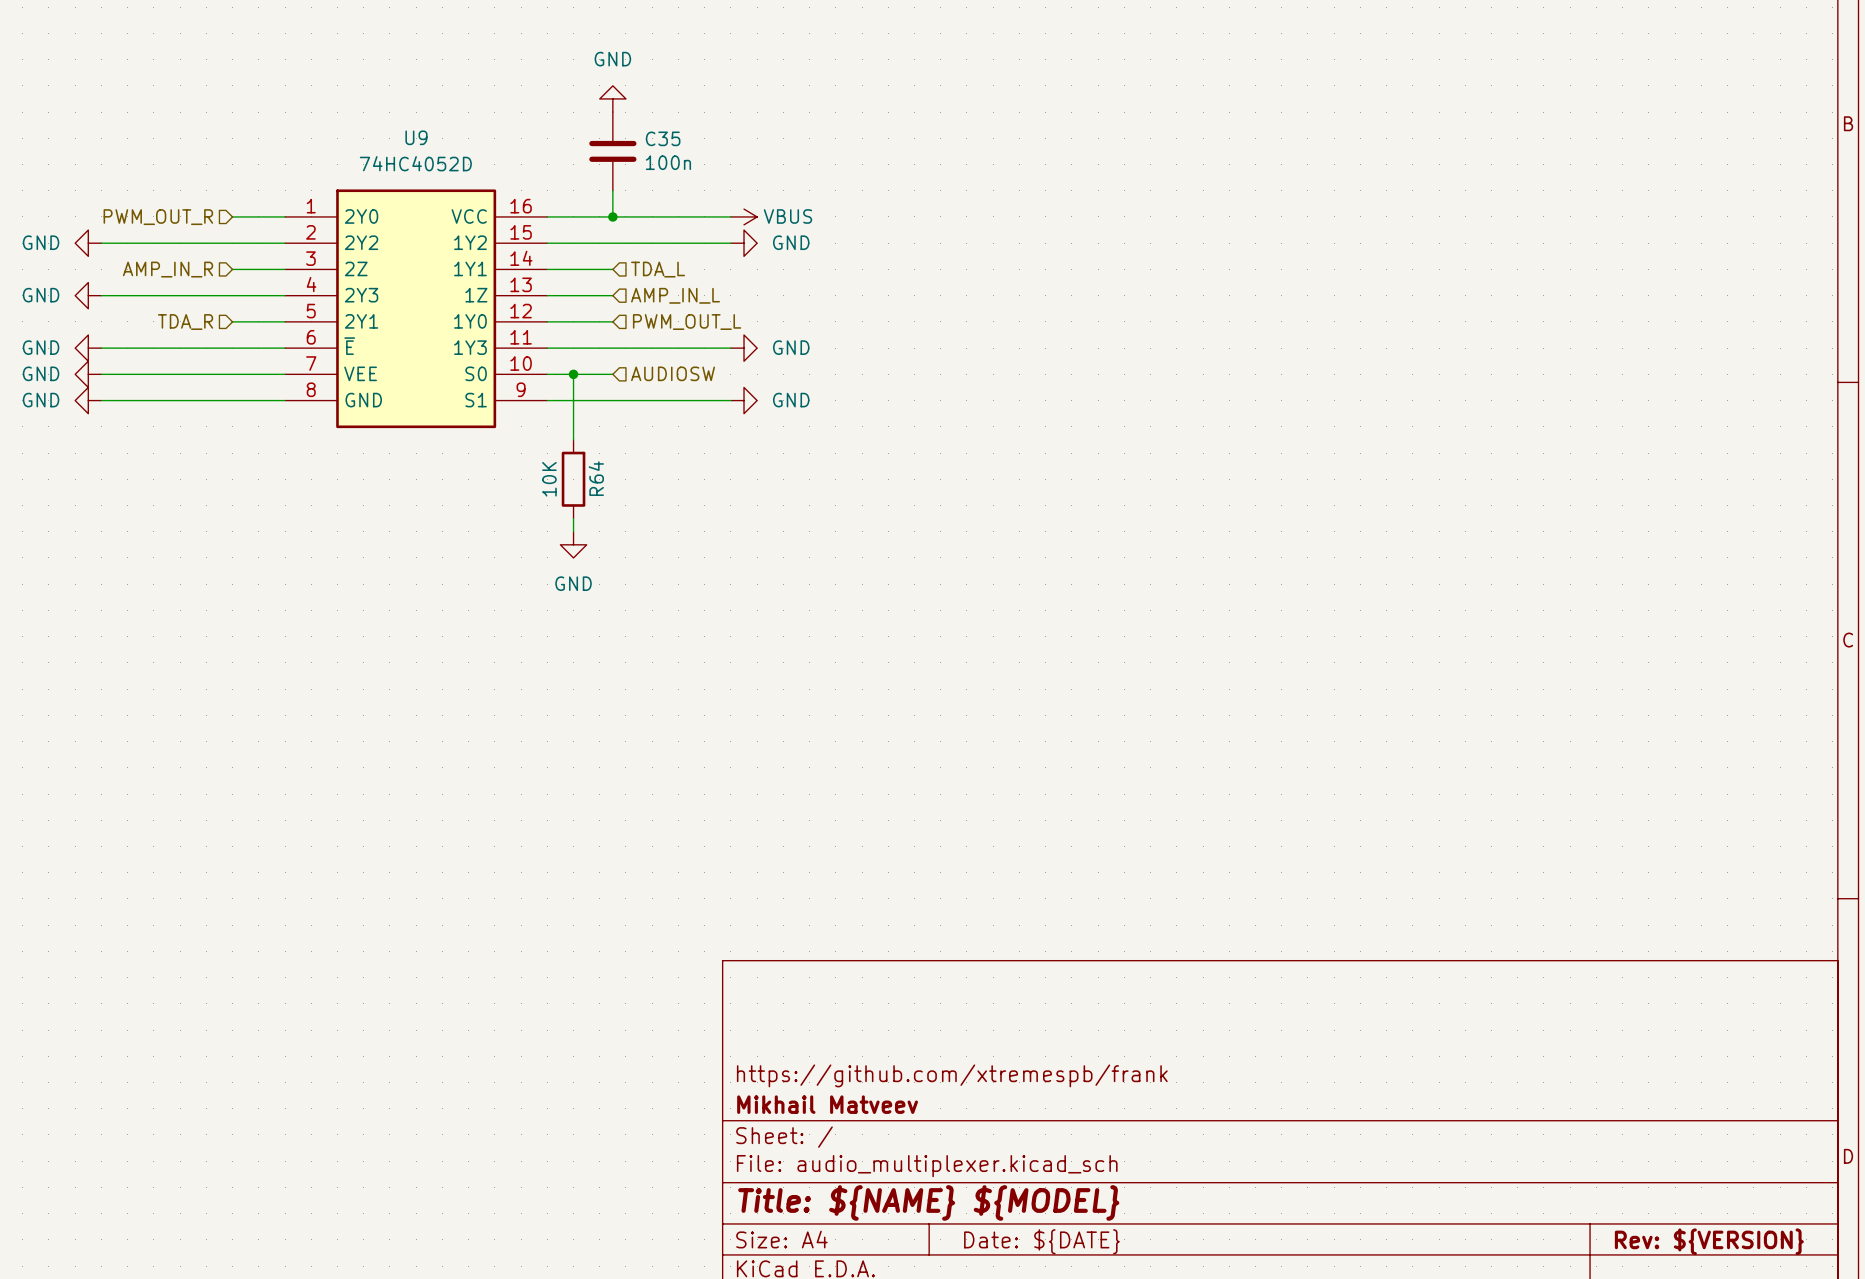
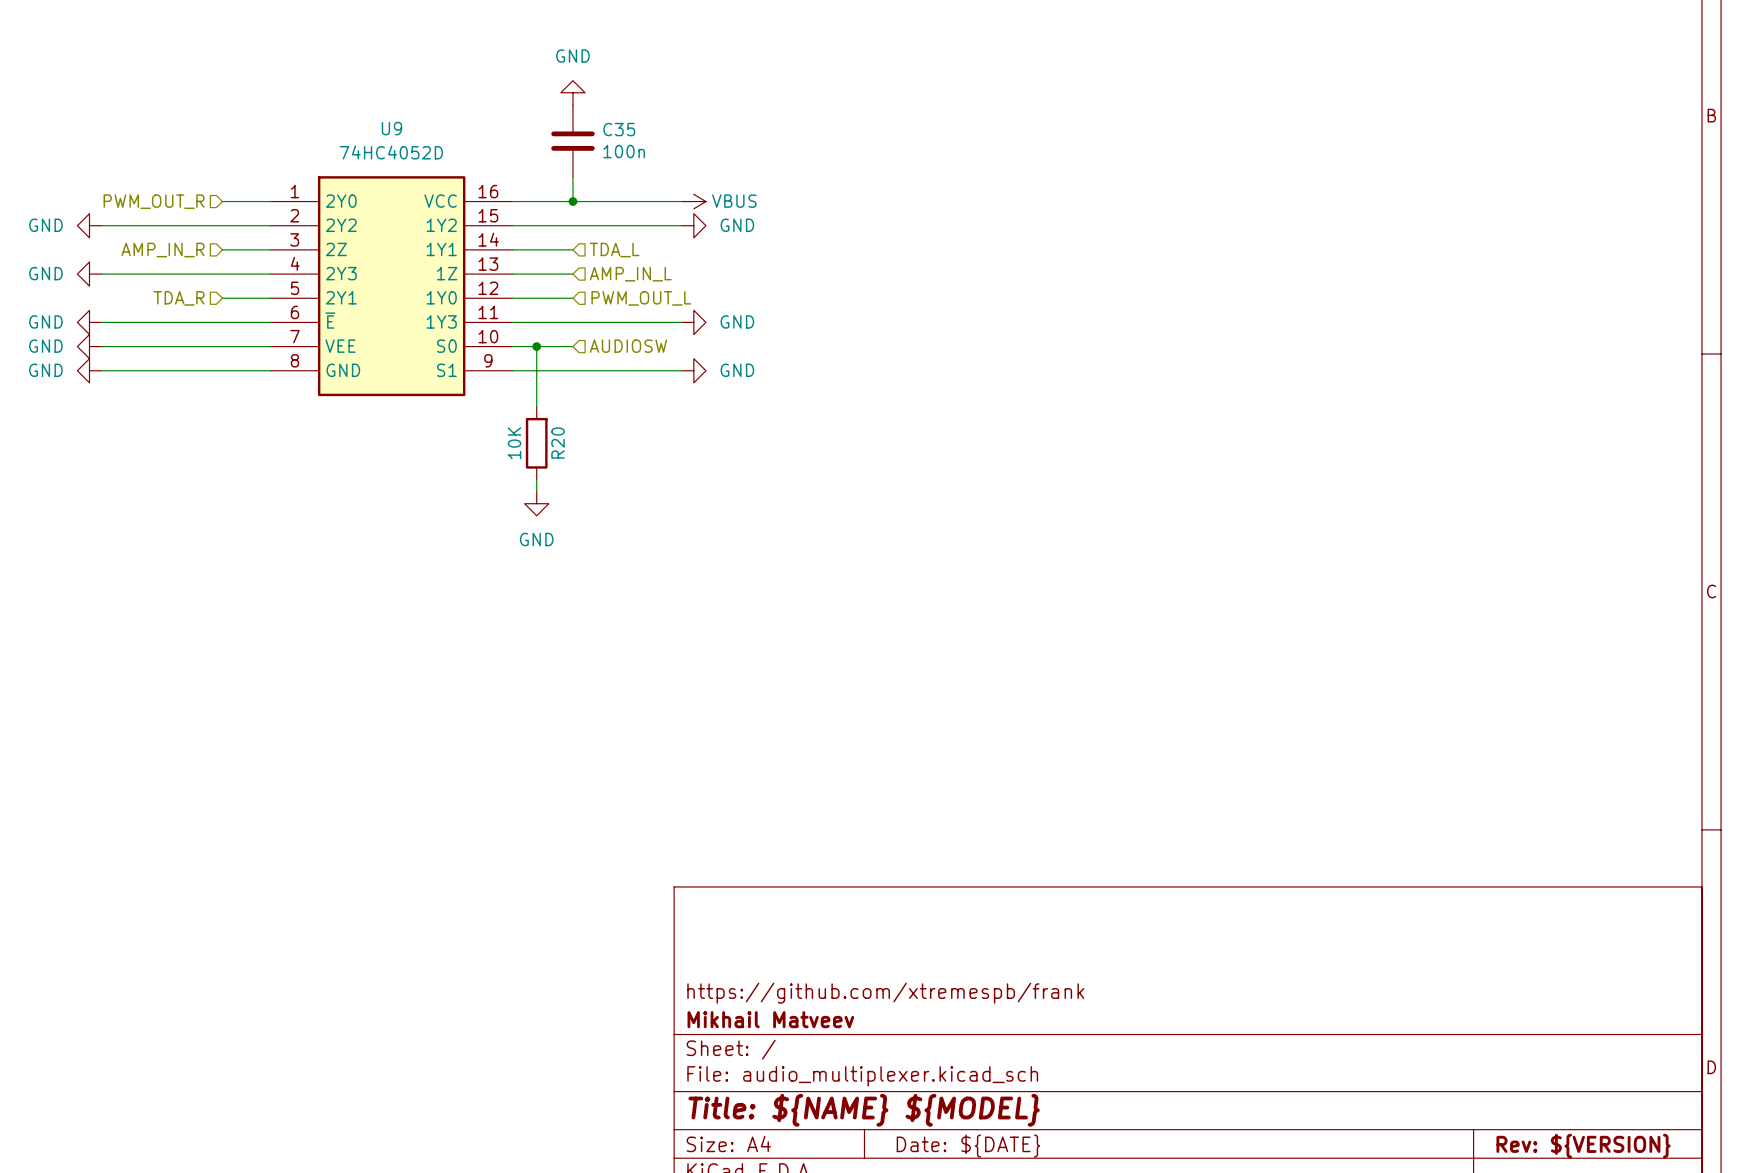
R64 name: R64 (596, 478) -> R20 (558, 443)

